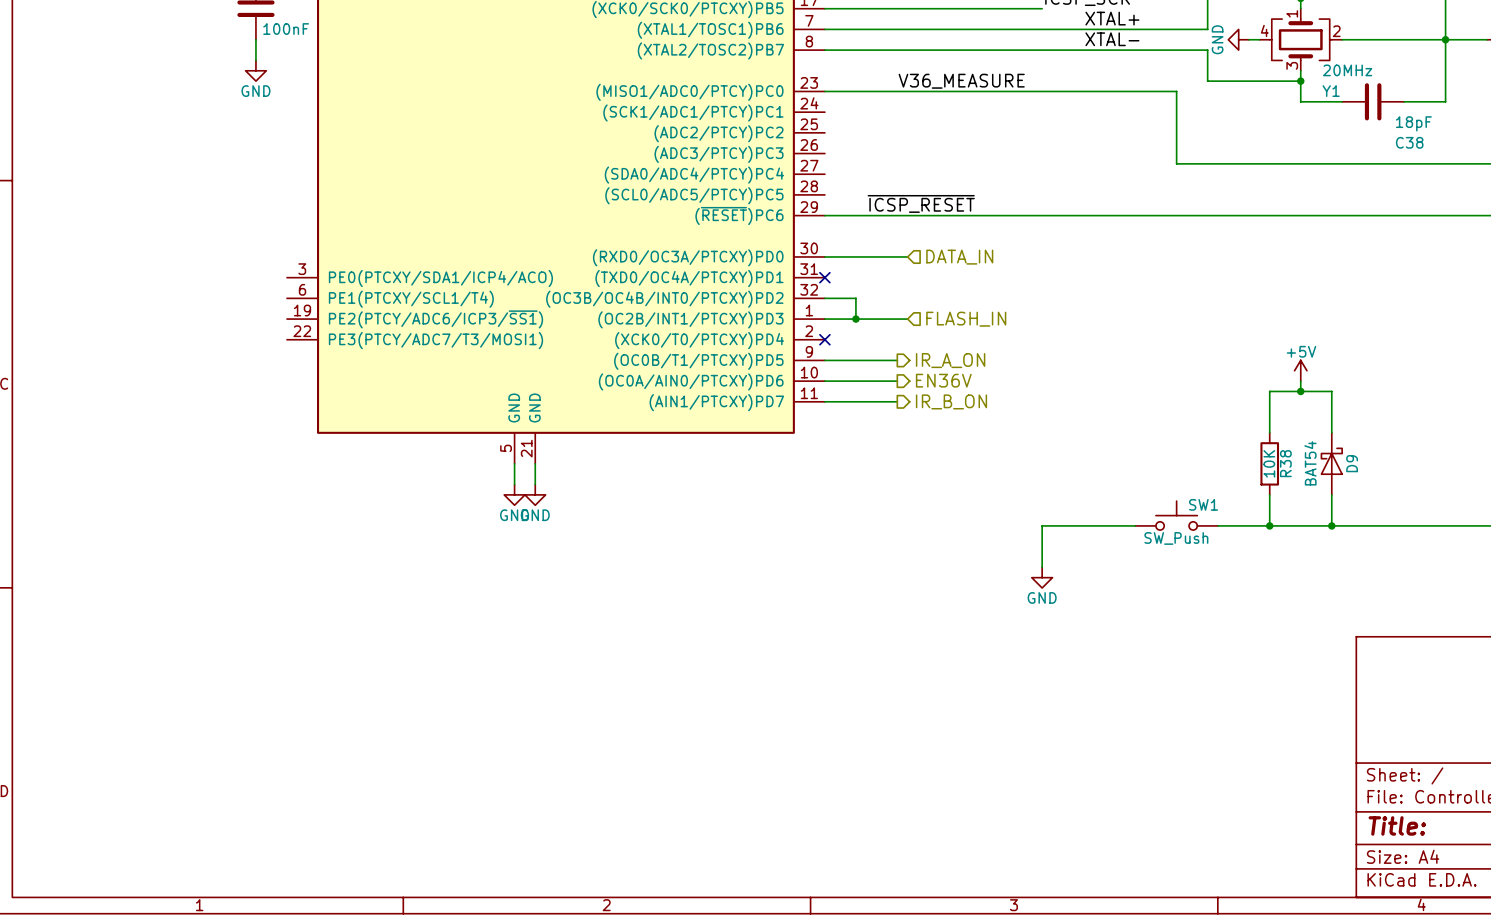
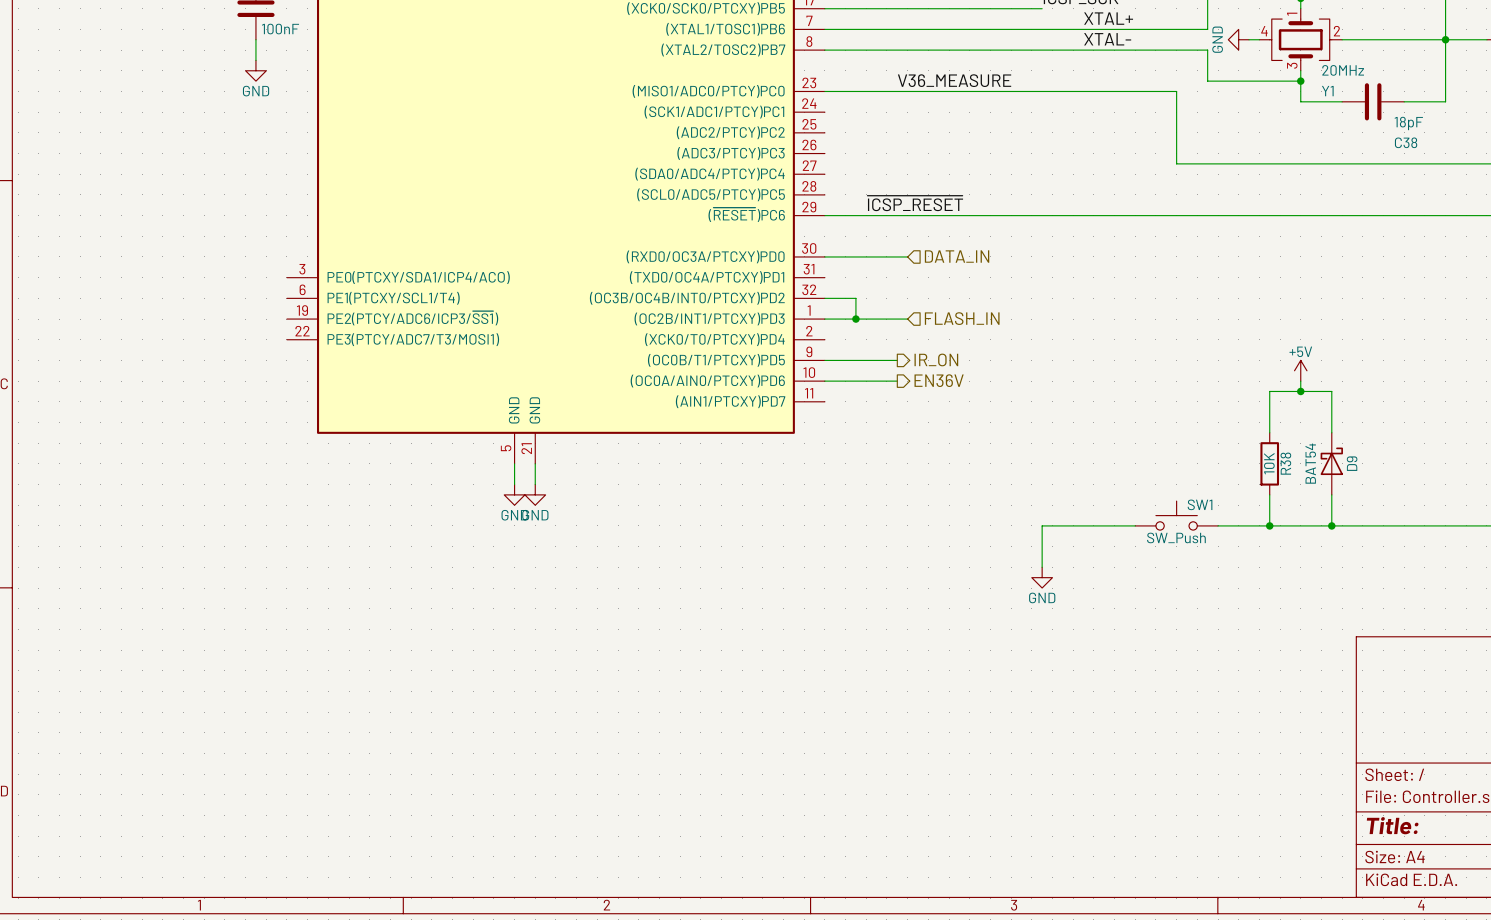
no-connect mark: (824, 277) -> none
no-connect mark: (824, 339) -> none
hierarchical label: IR_A_ON (950, 360) -> IR_ON (936, 359)
wire: (824, 401) (897, 401) -> none
hierarchical label: IR_B_ON (951, 401) -> none

